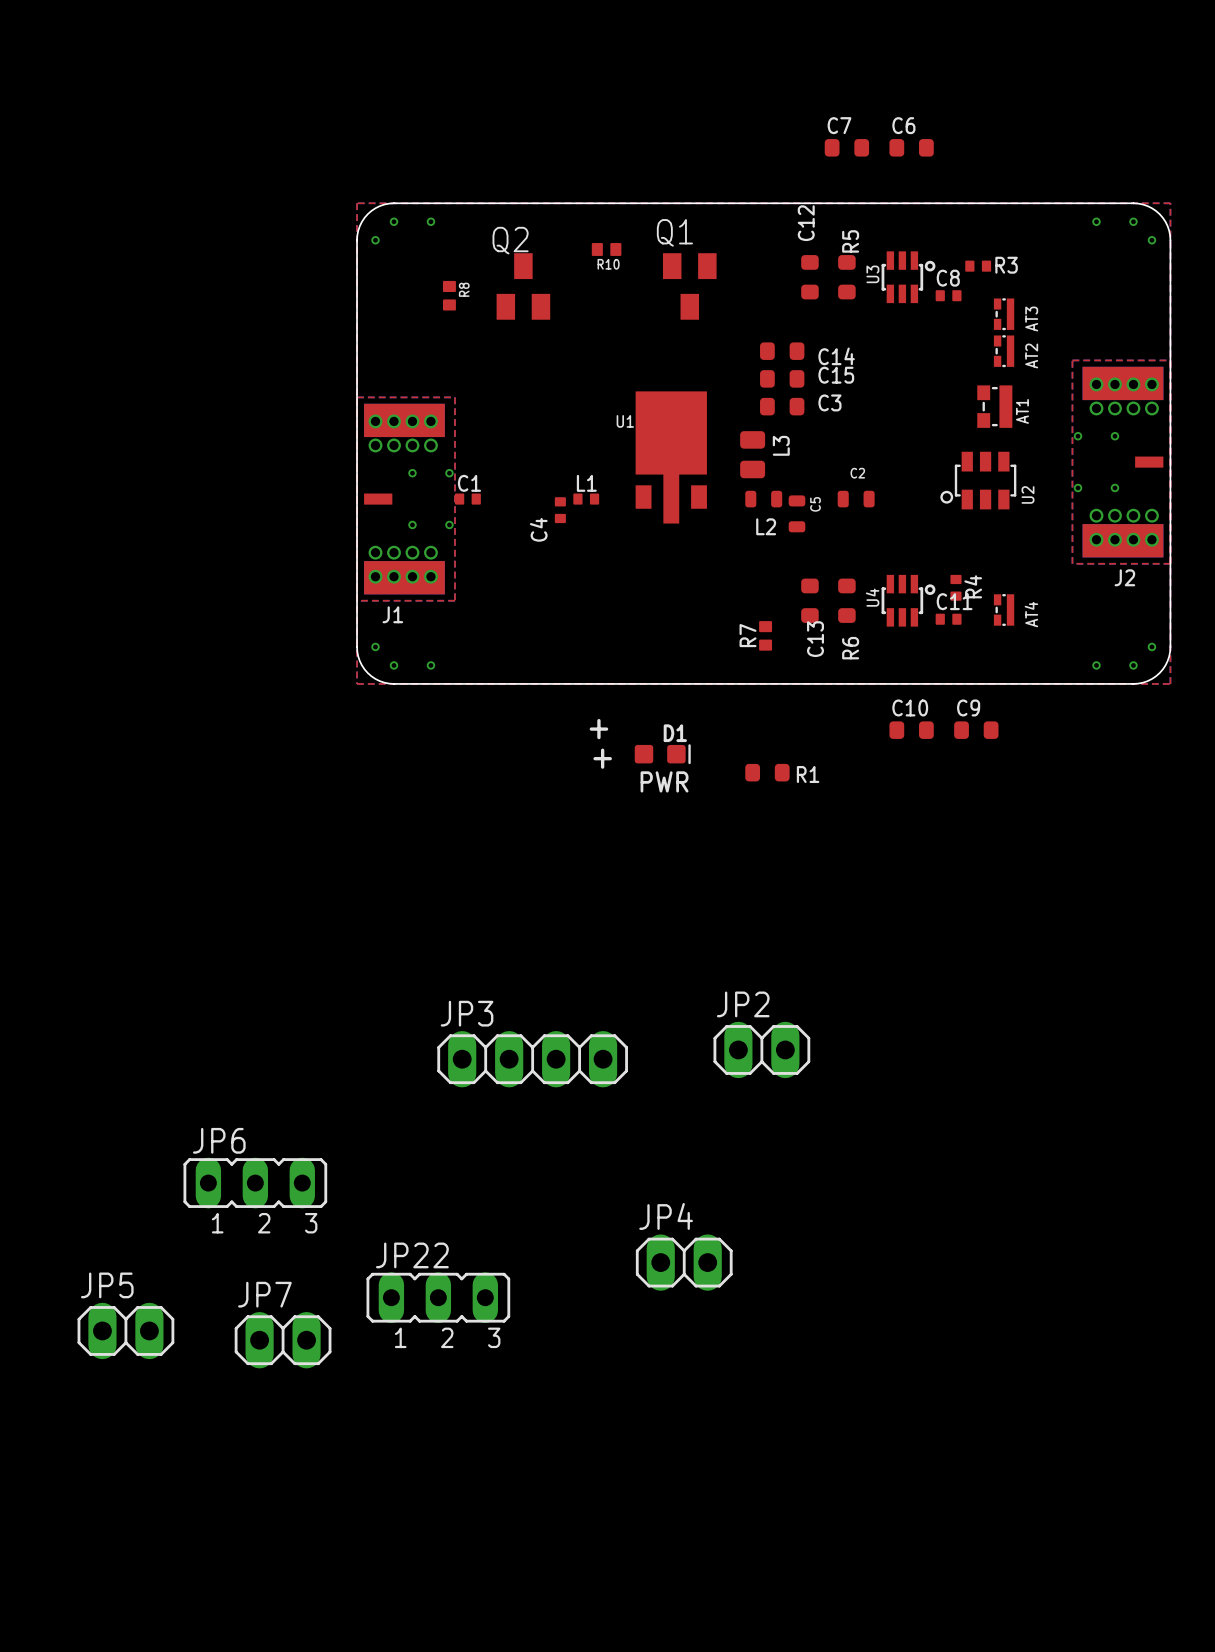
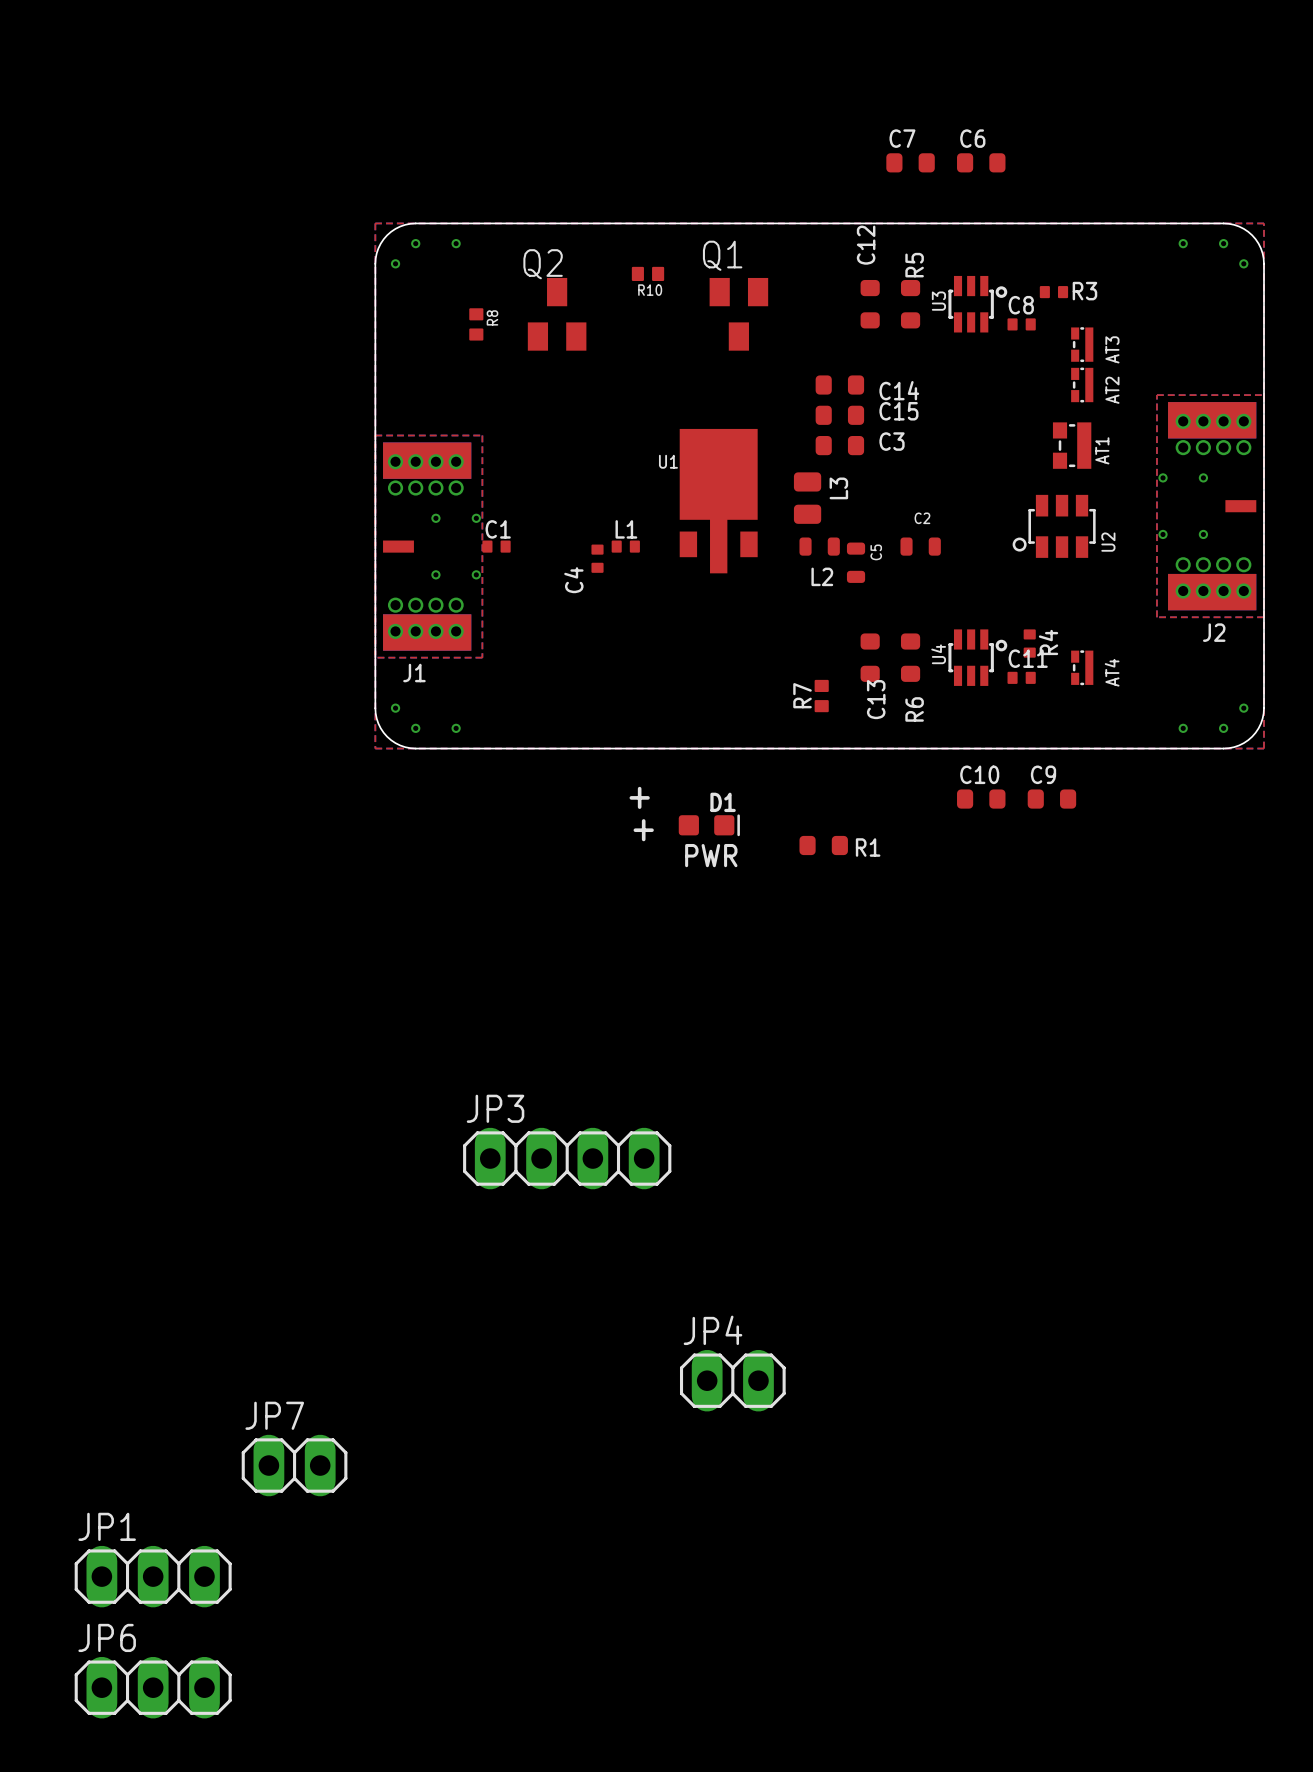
JP2: (761, 1049) -> none
JP6 footprint: [183, 1157, 328, 1209] -> [74, 1656, 232, 1719]
JP22: (438, 1297) -> none
JP5: (125, 1330) -> none
JP1: none -> (153, 1576)

